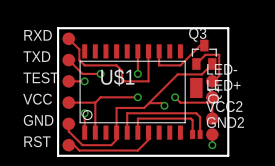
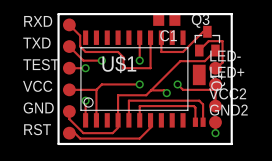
C1: none -> (166, 19)

